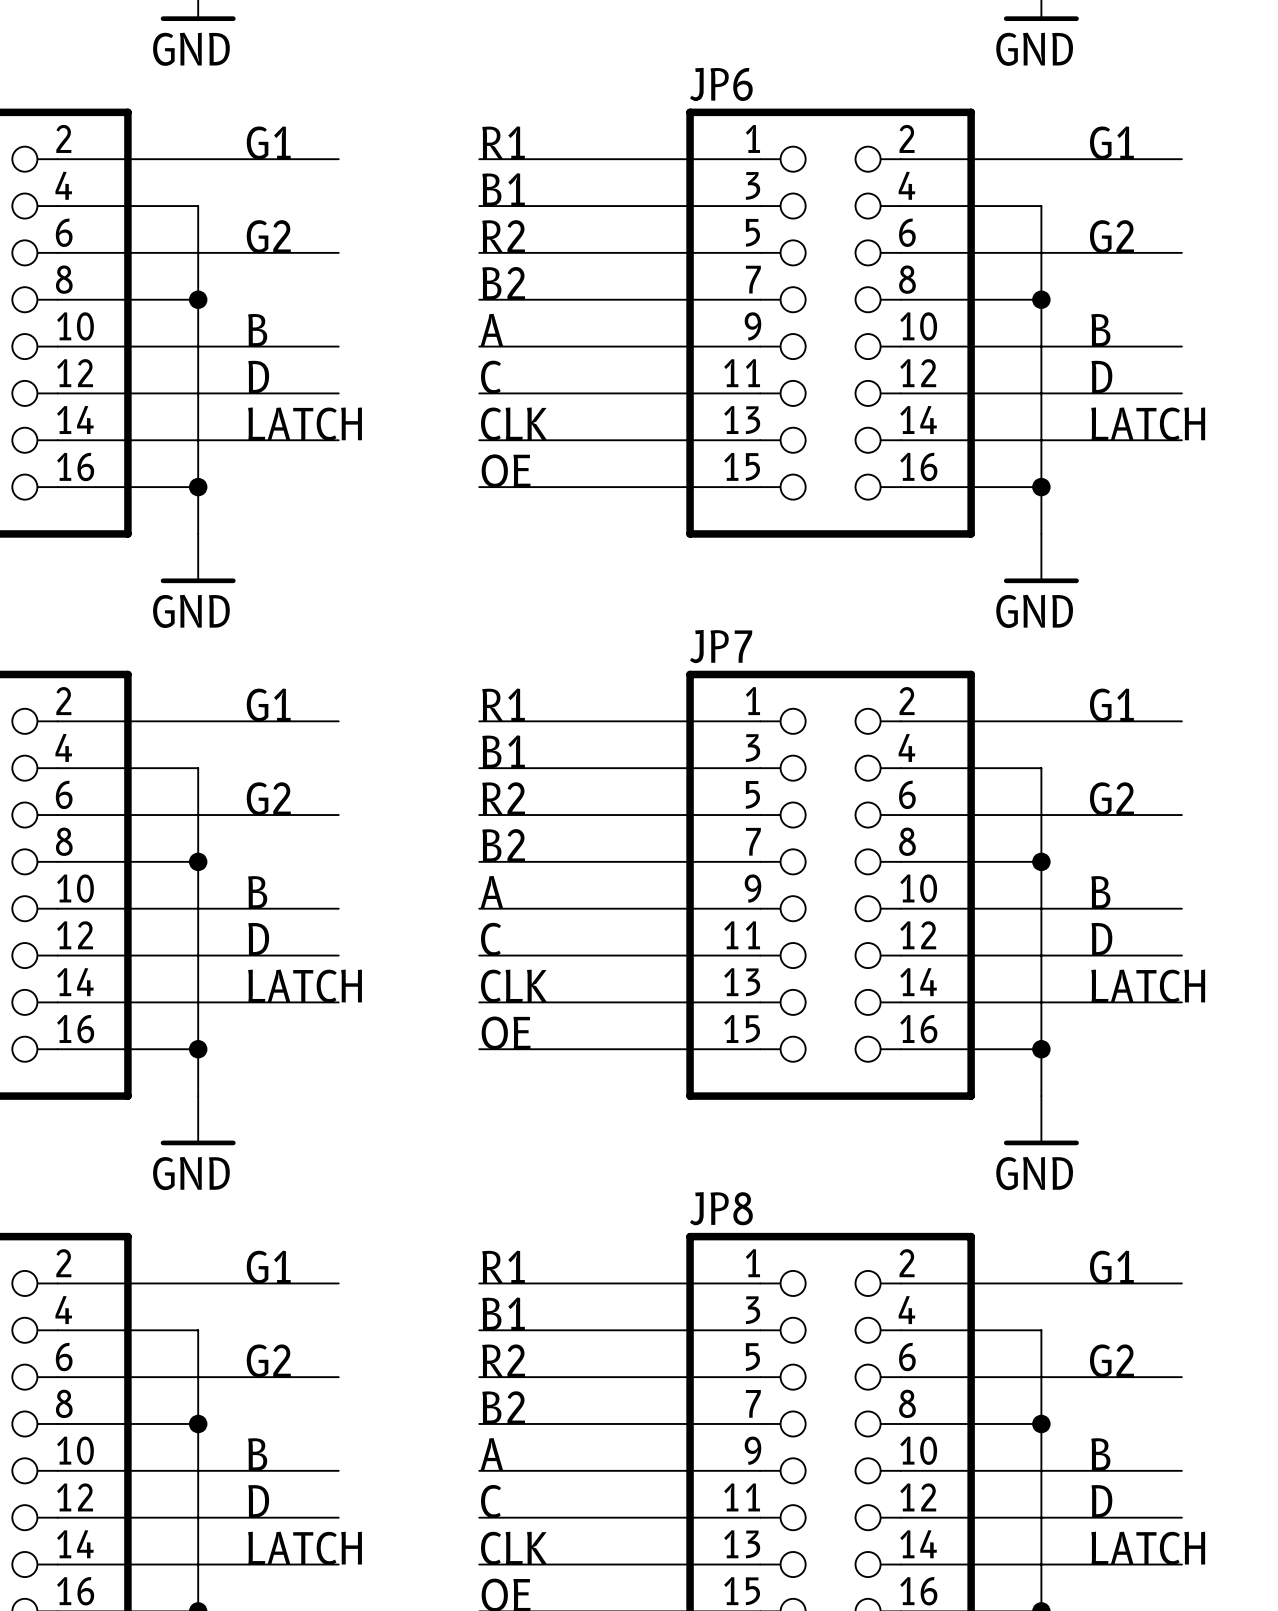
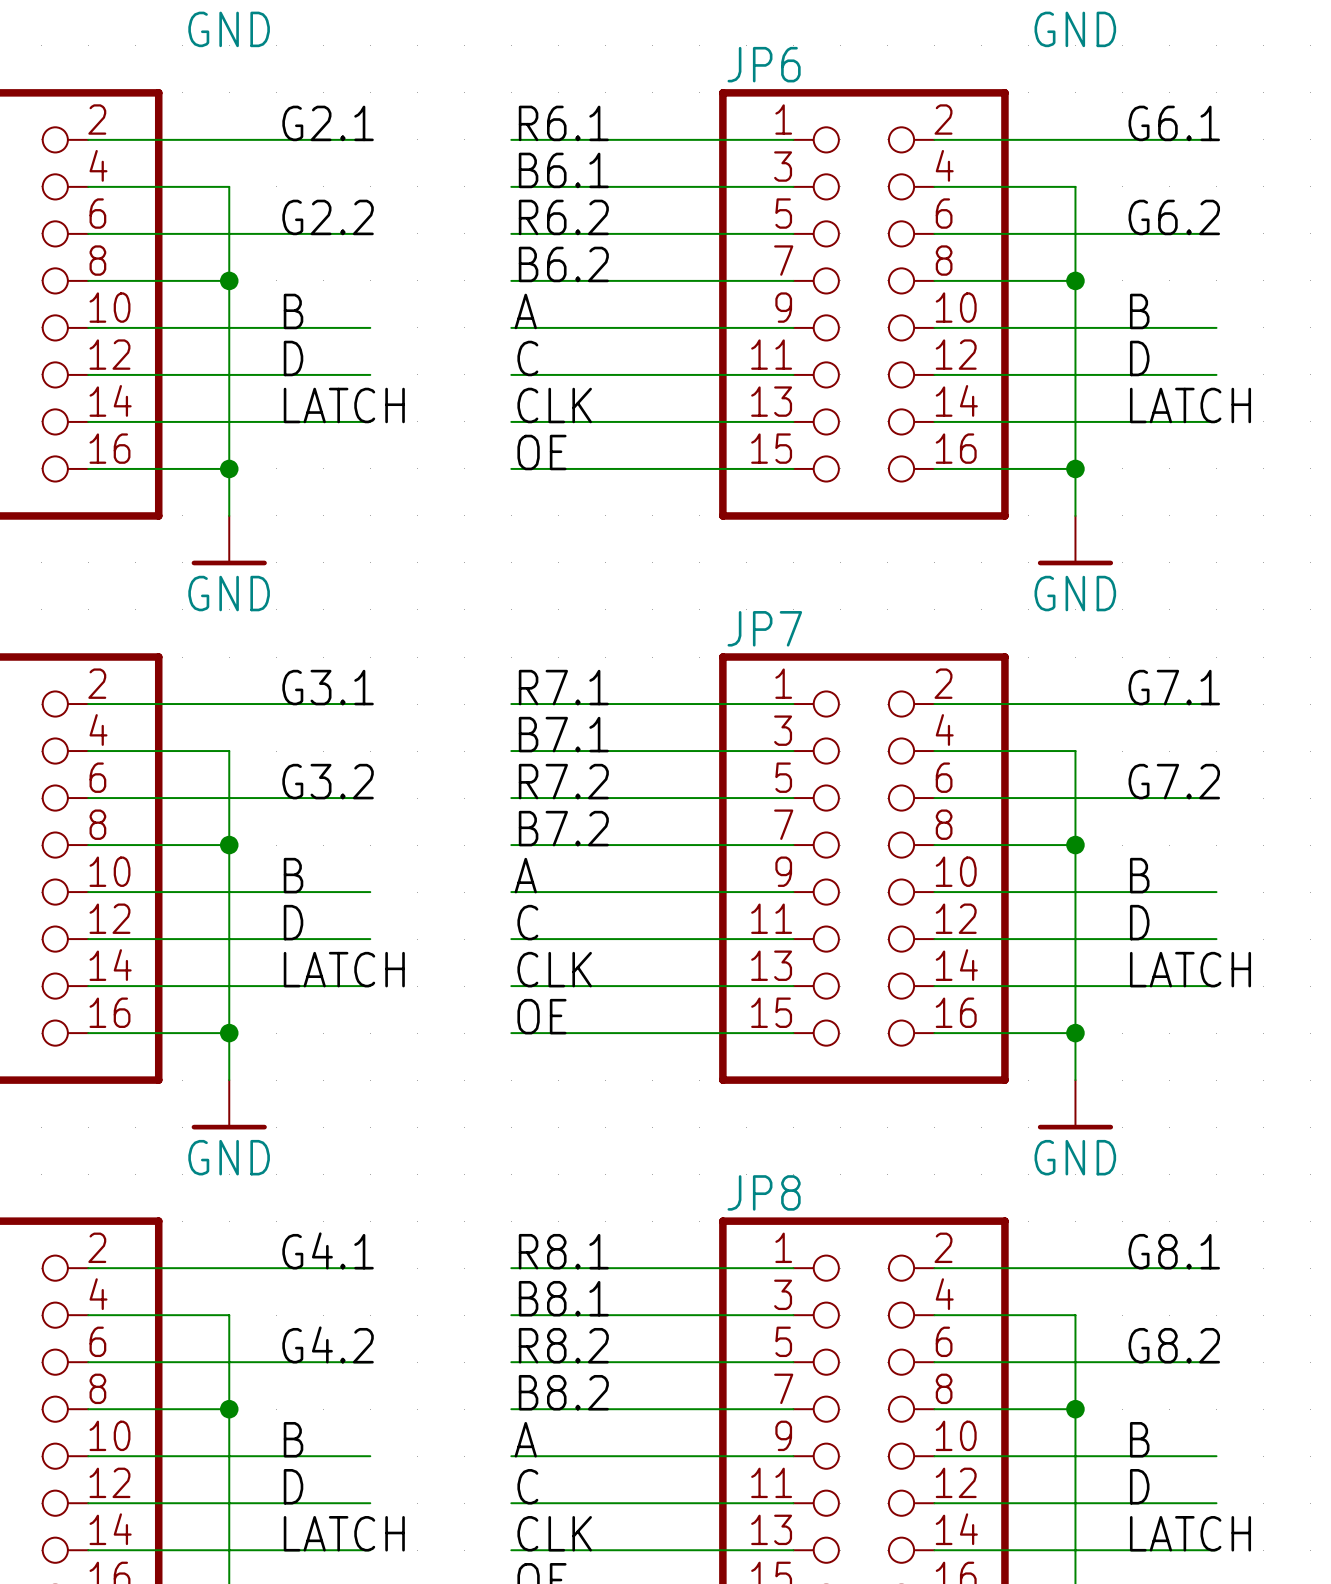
label: G1 (268, 142) -> G2.1 (328, 123)
label: R1 (503, 142) -> R6.1 (563, 123)
label: G1 (1111, 142) -> G6.1 (1174, 123)
label: B1 (503, 189) -> B6.1 (563, 170)
label: G2 (268, 236) -> G2.2 (328, 217)
label: R2 (503, 236) -> R6.2 (563, 217)
label: G2 (1111, 236) -> G6.2 (1174, 217)
label: B2 (503, 283) -> B6.2 (563, 264)
label: R1 (503, 704) -> R7.1 (563, 687)
label: G1 (268, 705) -> G3.1 (328, 687)
label: G1 (1111, 705) -> G7.1 (1174, 687)
label: B1 (503, 751) -> B7.1 (563, 734)
label: G2 (268, 798) -> G3.2 (328, 781)
label: R2 (503, 798) -> R7.2 (563, 781)
label: G2 (1111, 798) -> G7.2 (1174, 781)
label: B2 (503, 845) -> B7.2 (563, 828)
label: G1 (268, 1267) -> G4.1 (328, 1250)
label: R1 (503, 1267) -> R8.1 (563, 1251)
label: G1 (1111, 1267) -> G8.1 (1174, 1251)
label: B1 (503, 1313) -> B8.1 (563, 1298)
label: G2 (268, 1360) -> G4.2 (328, 1344)
label: R2 (503, 1360) -> R8.2 (563, 1345)
label: G2 (1111, 1360) -> G8.2 (1174, 1345)
label: B2 (503, 1407) -> B8.2 (563, 1392)

